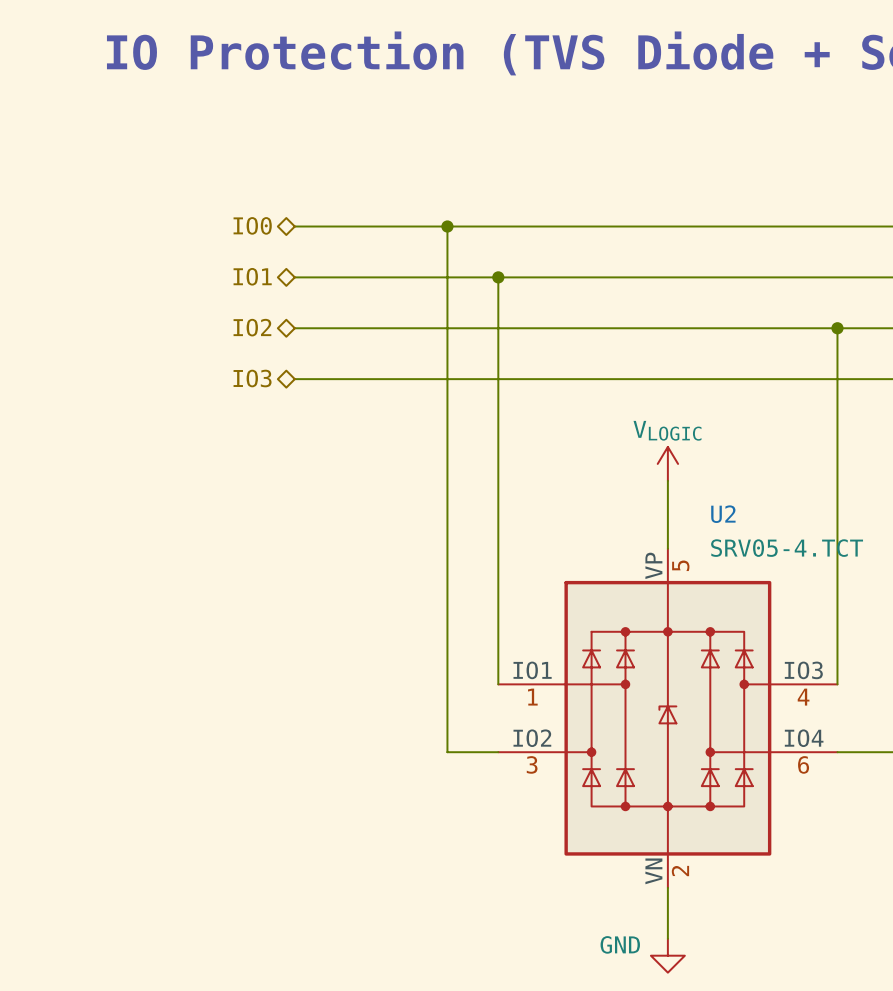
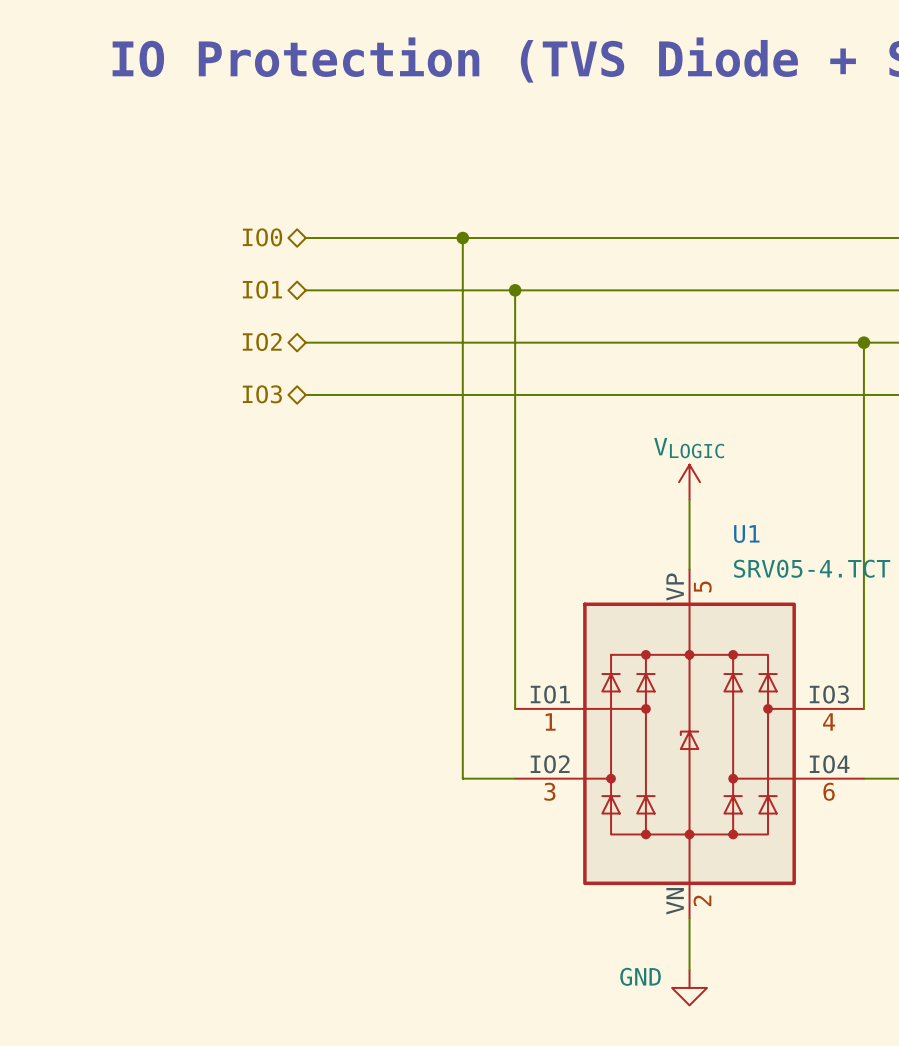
U2 name: U2 (723, 514) -> U1 (746, 534)

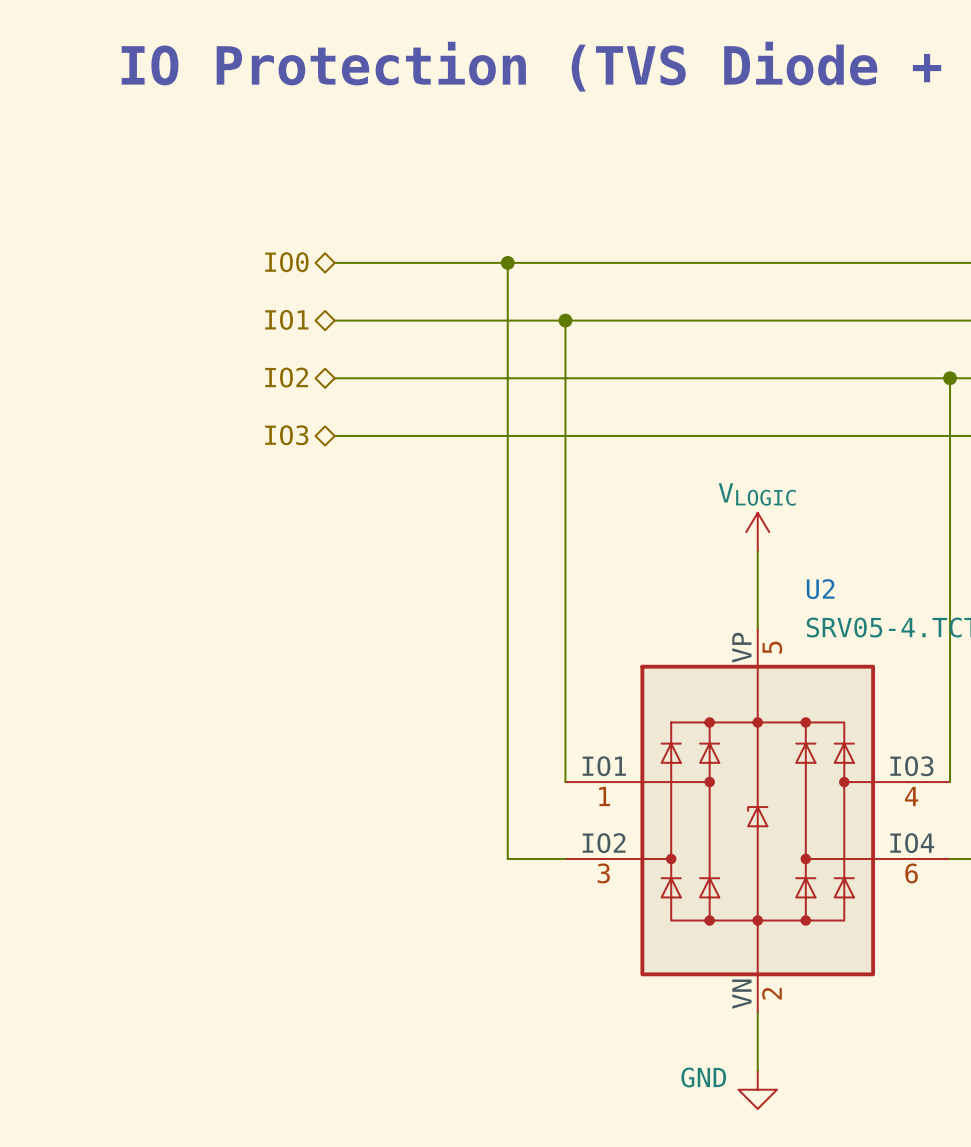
U1 name: U1 (746, 534) -> U2 (820, 589)

